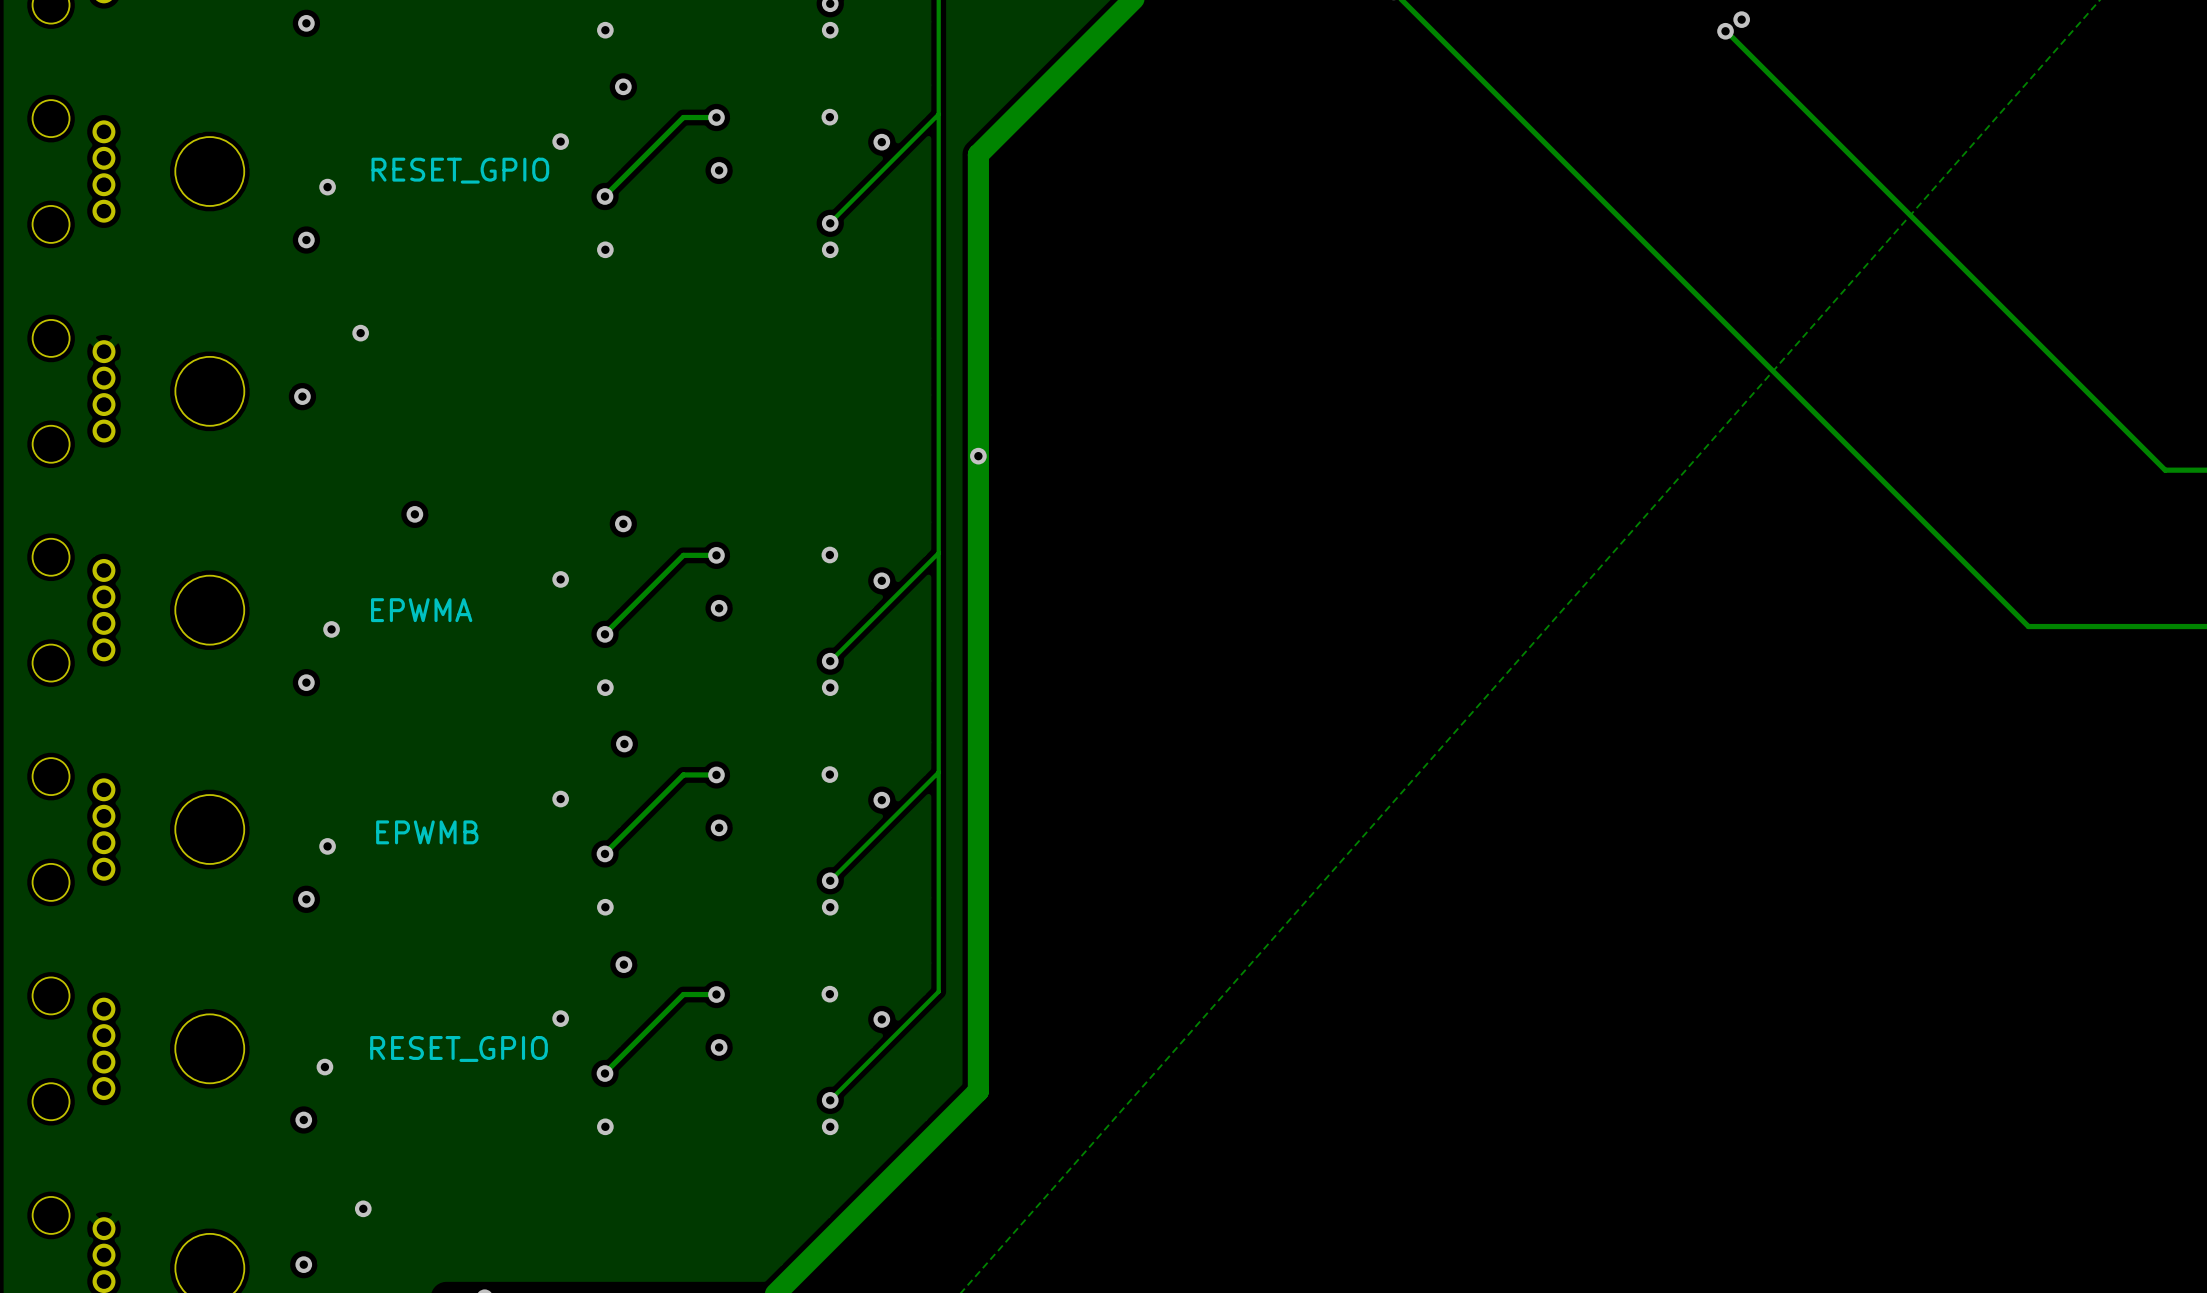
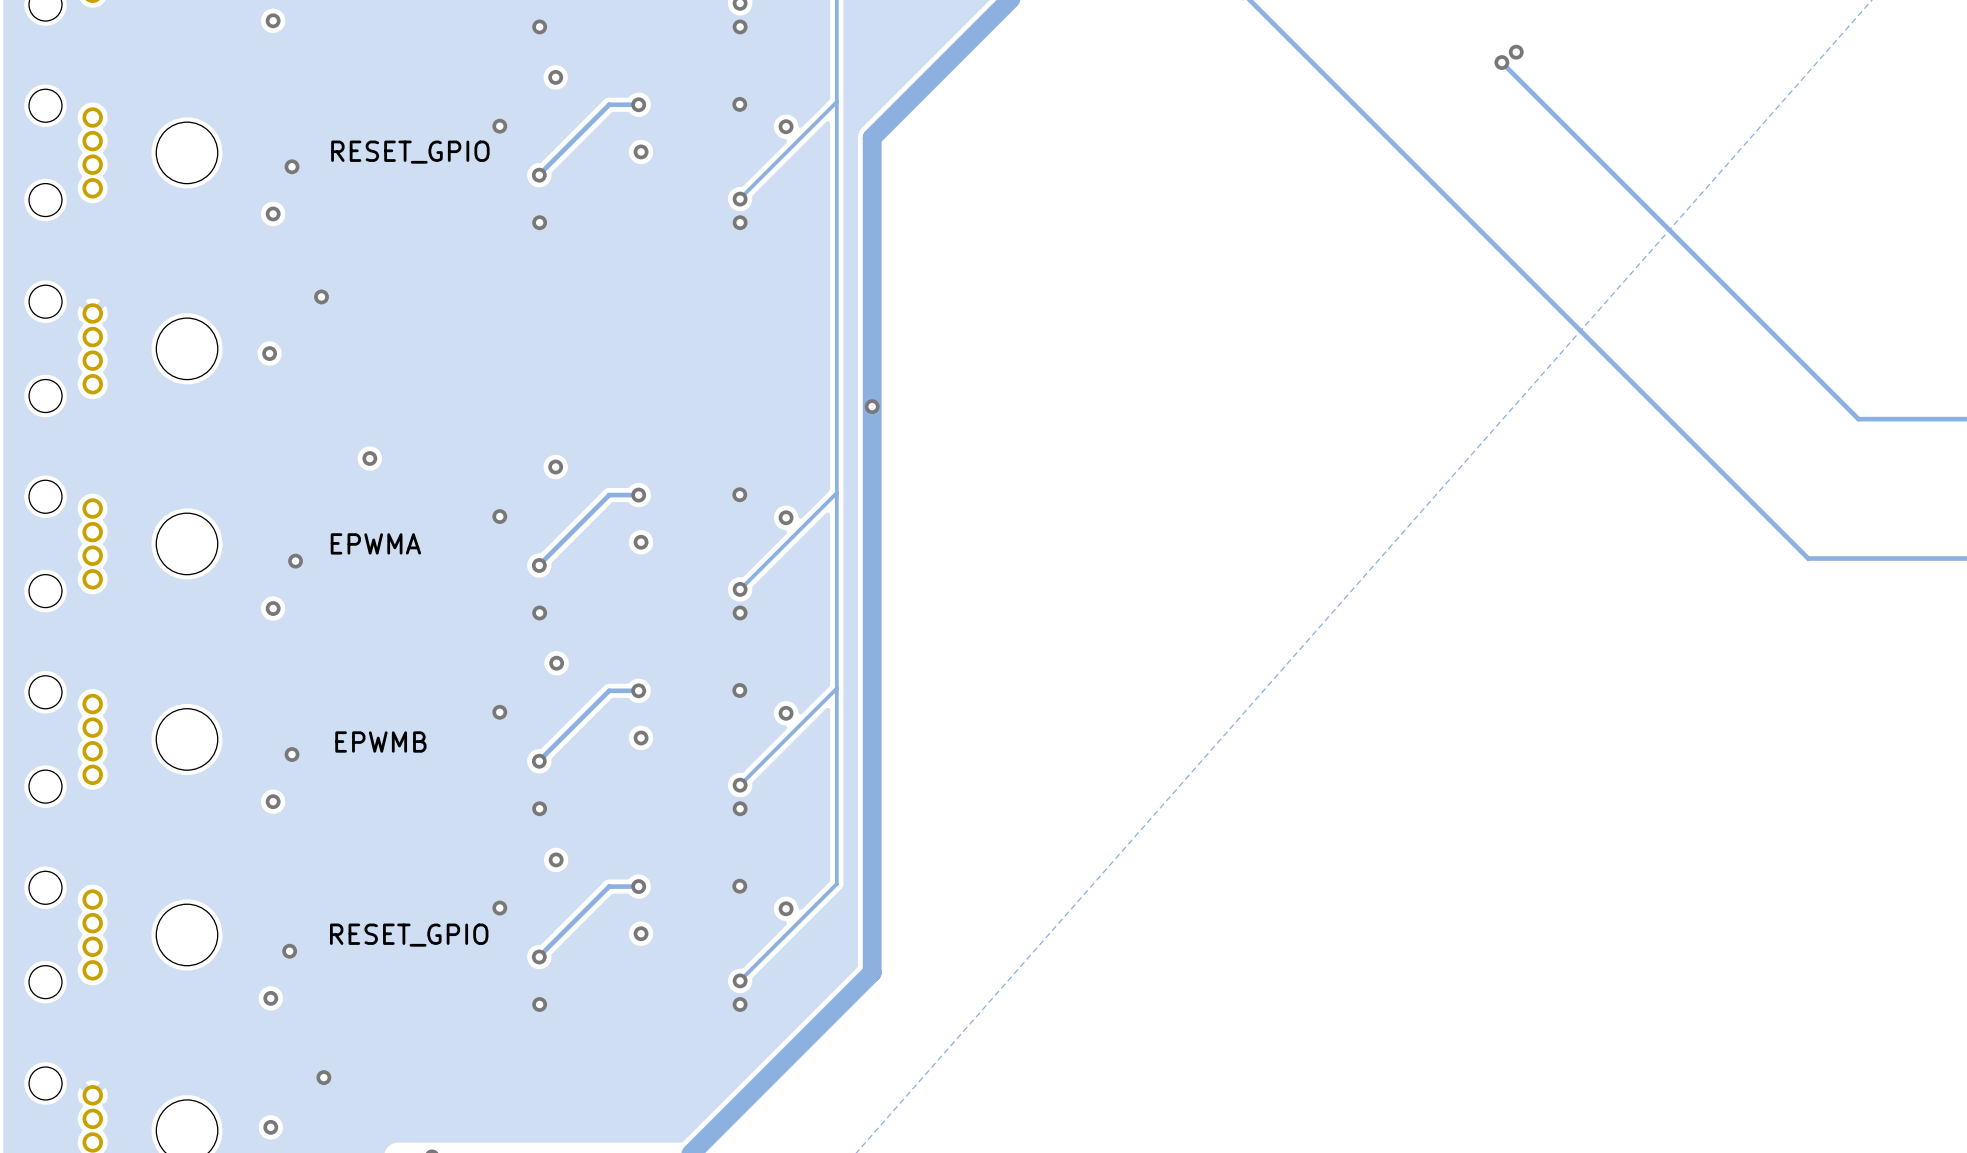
via: (1741, 19) -> none
track: (1725, 31) (2165, 470) -> (1501, 62) (1858, 419) (1930, 419)
via: (1725, 31) -> none
via: none -> (1516, 52)
via: none -> (1501, 62)

